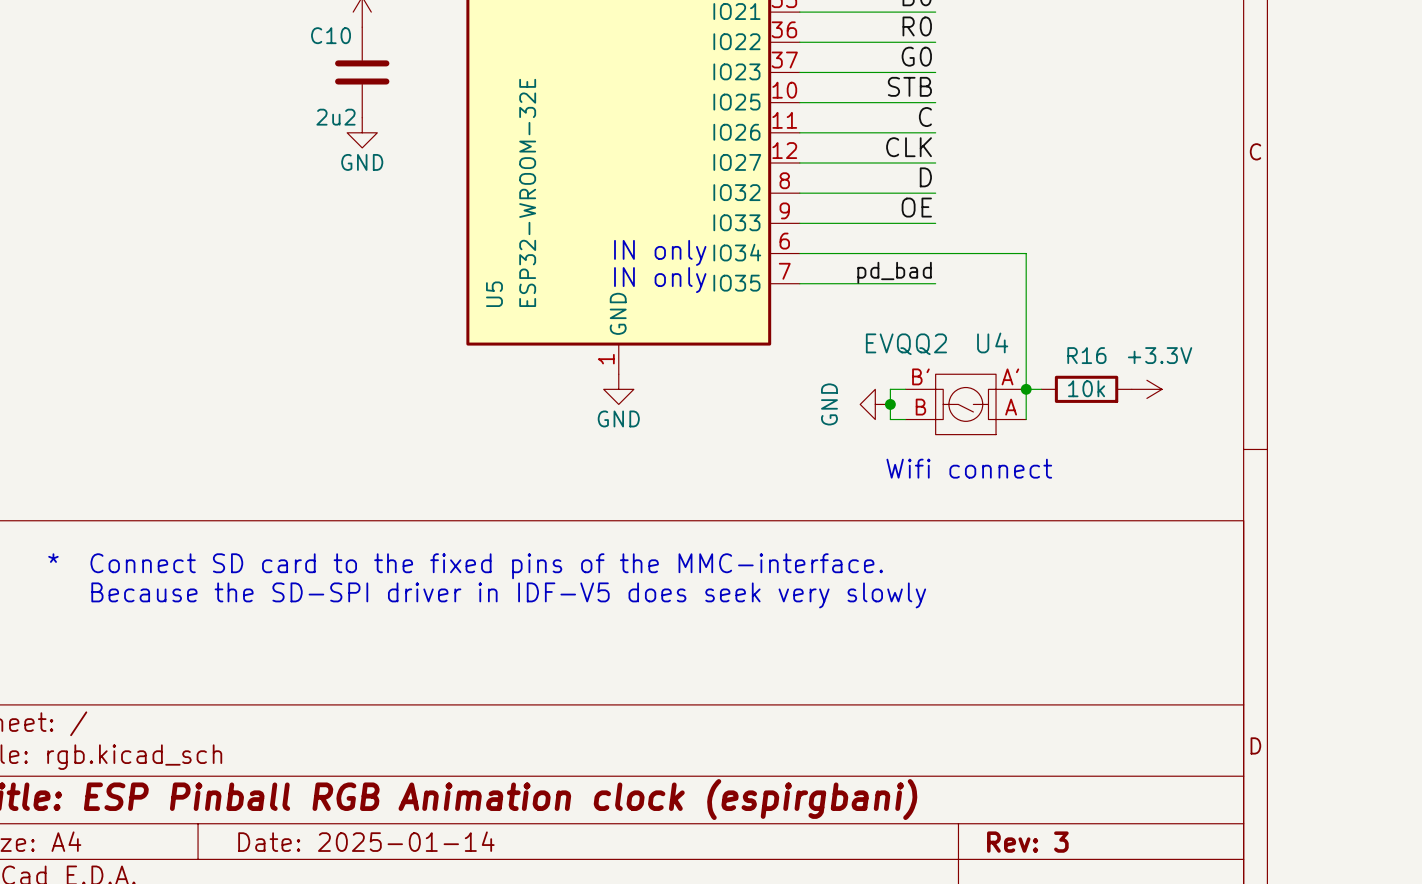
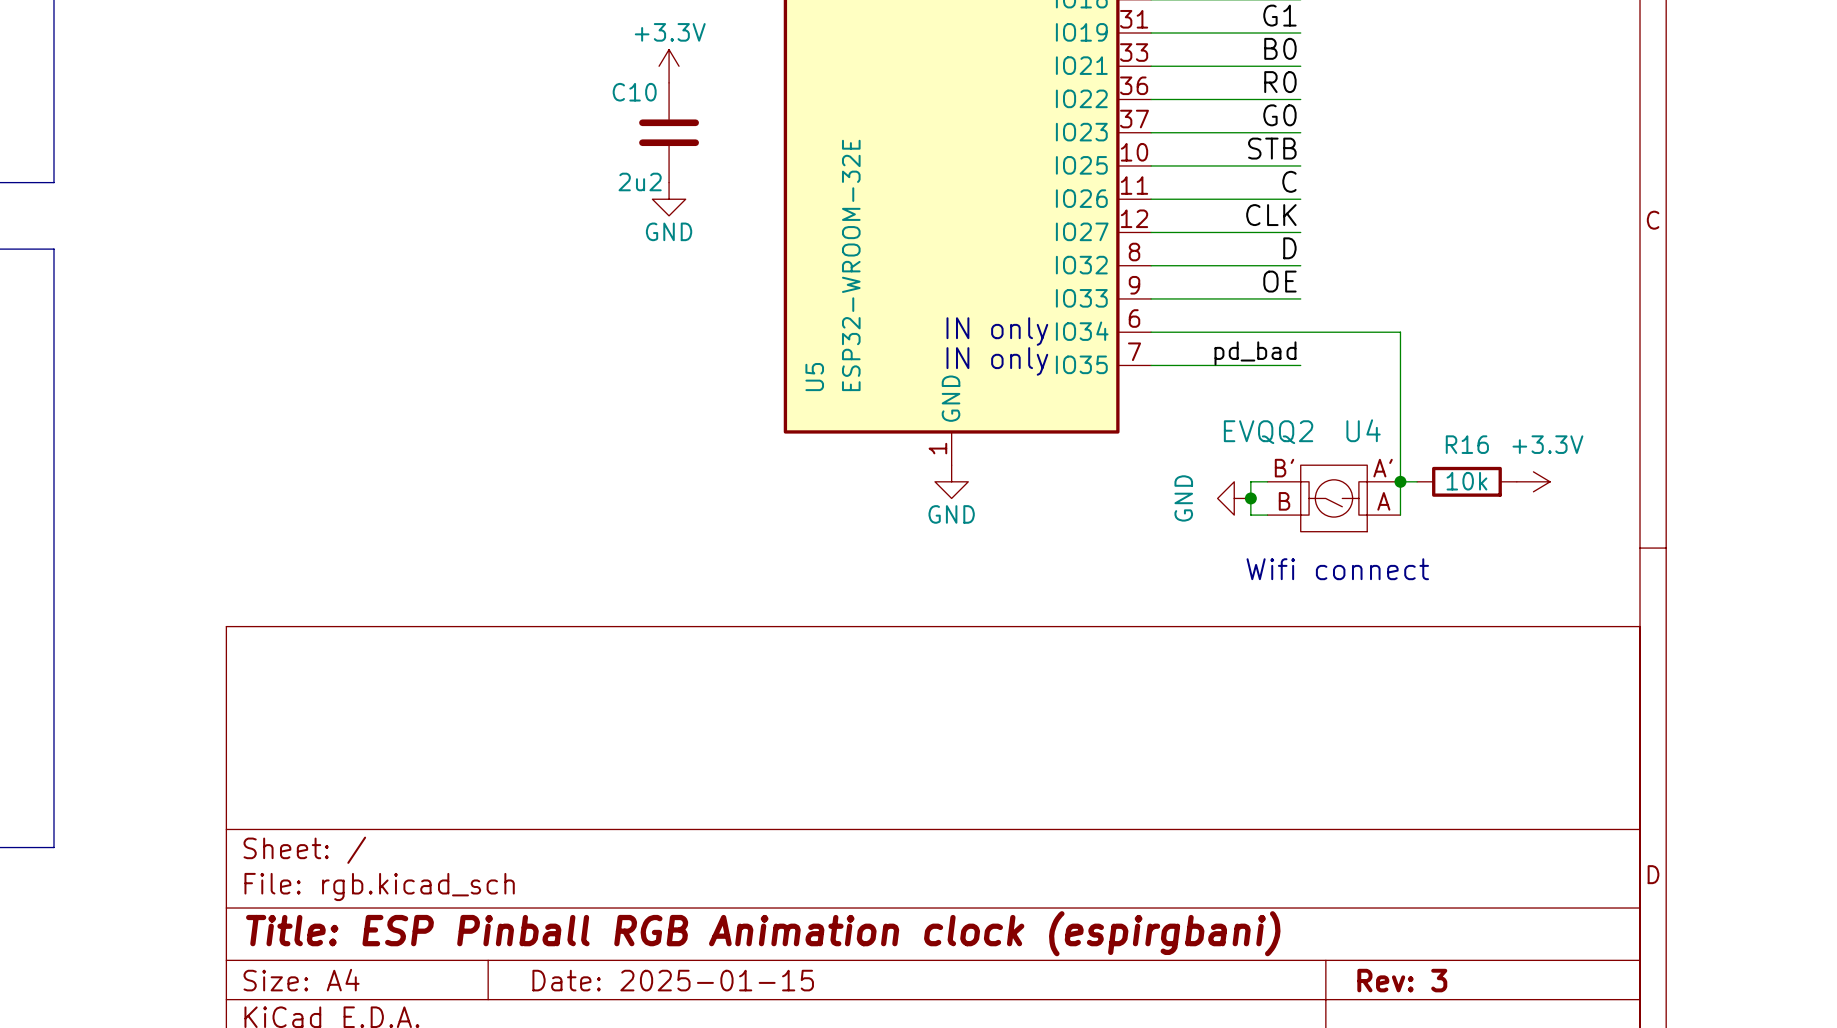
text: * Connect SD card to the fixed pins of the MMC-interface. (465, 566) -> none
text: Because the SD-SPI driver in IDF-V5 does seek very slowly (508, 595) -> none
title block: Date: 2025-01-14 (366, 841) -> Date: 2025-01-15 (673, 980)

